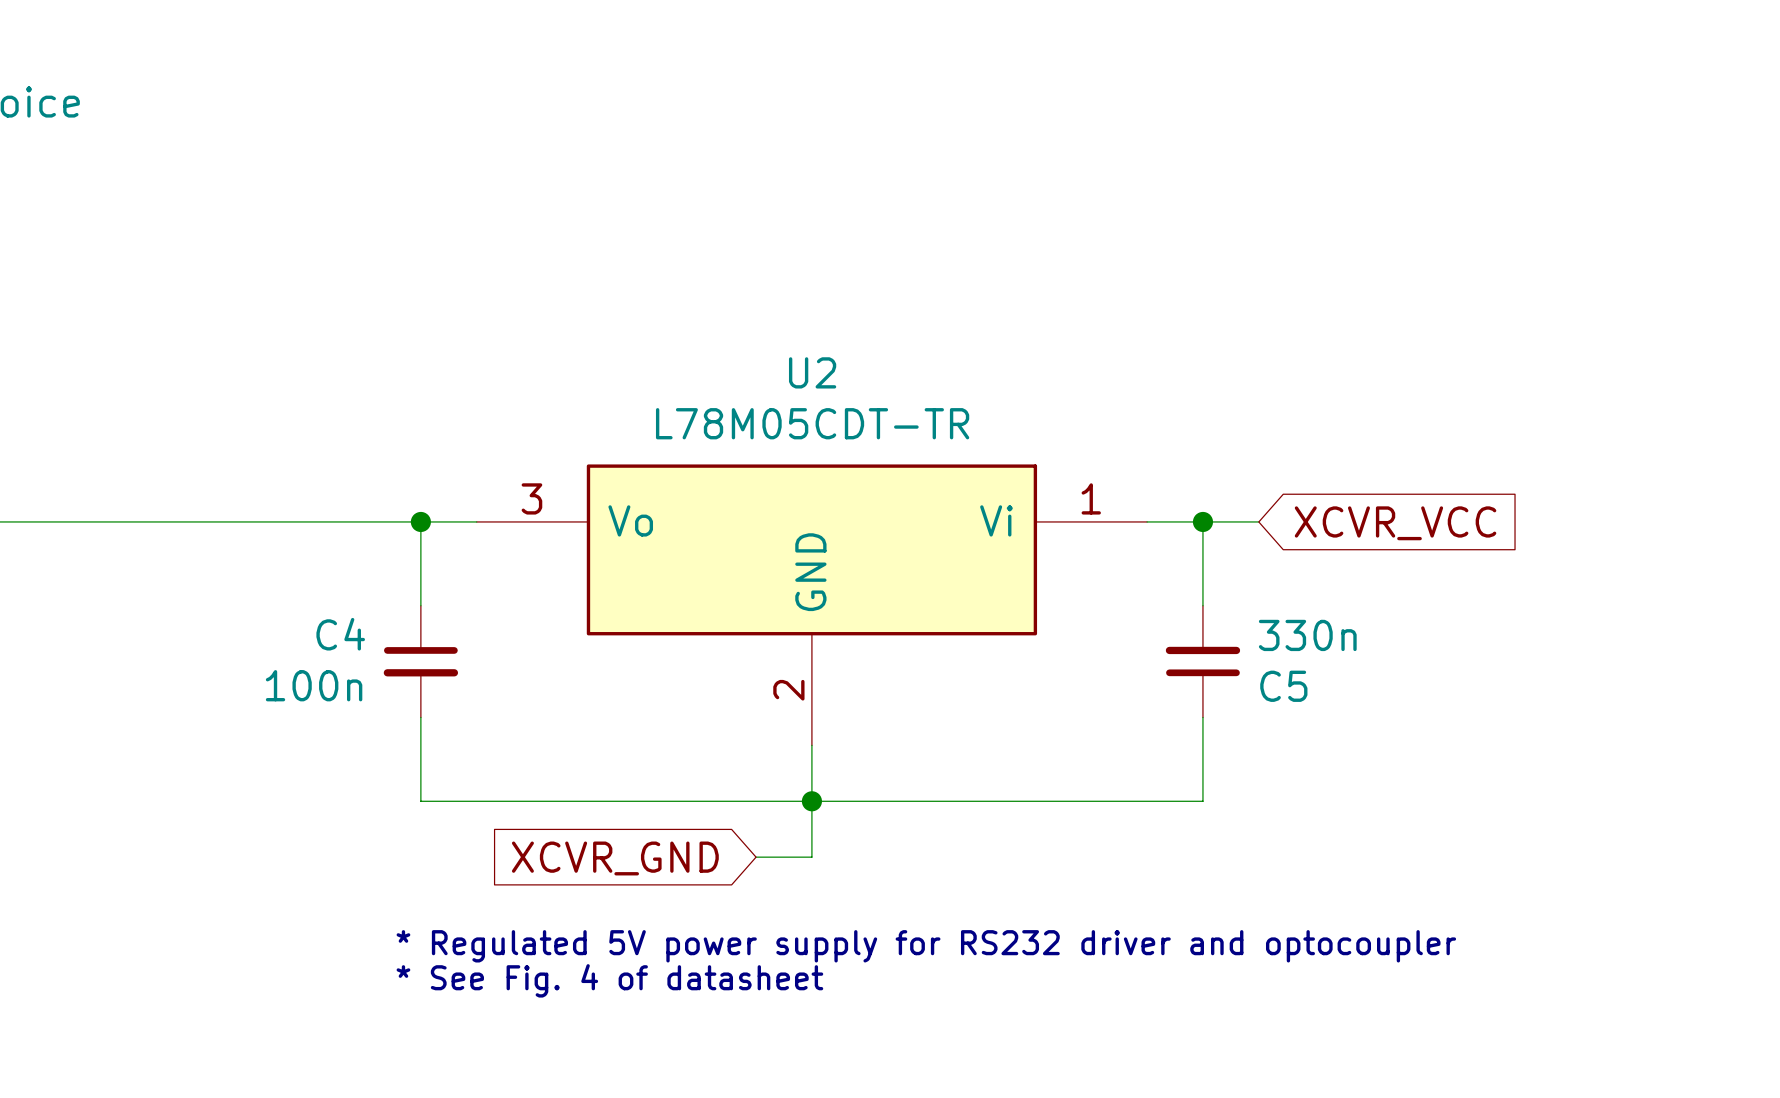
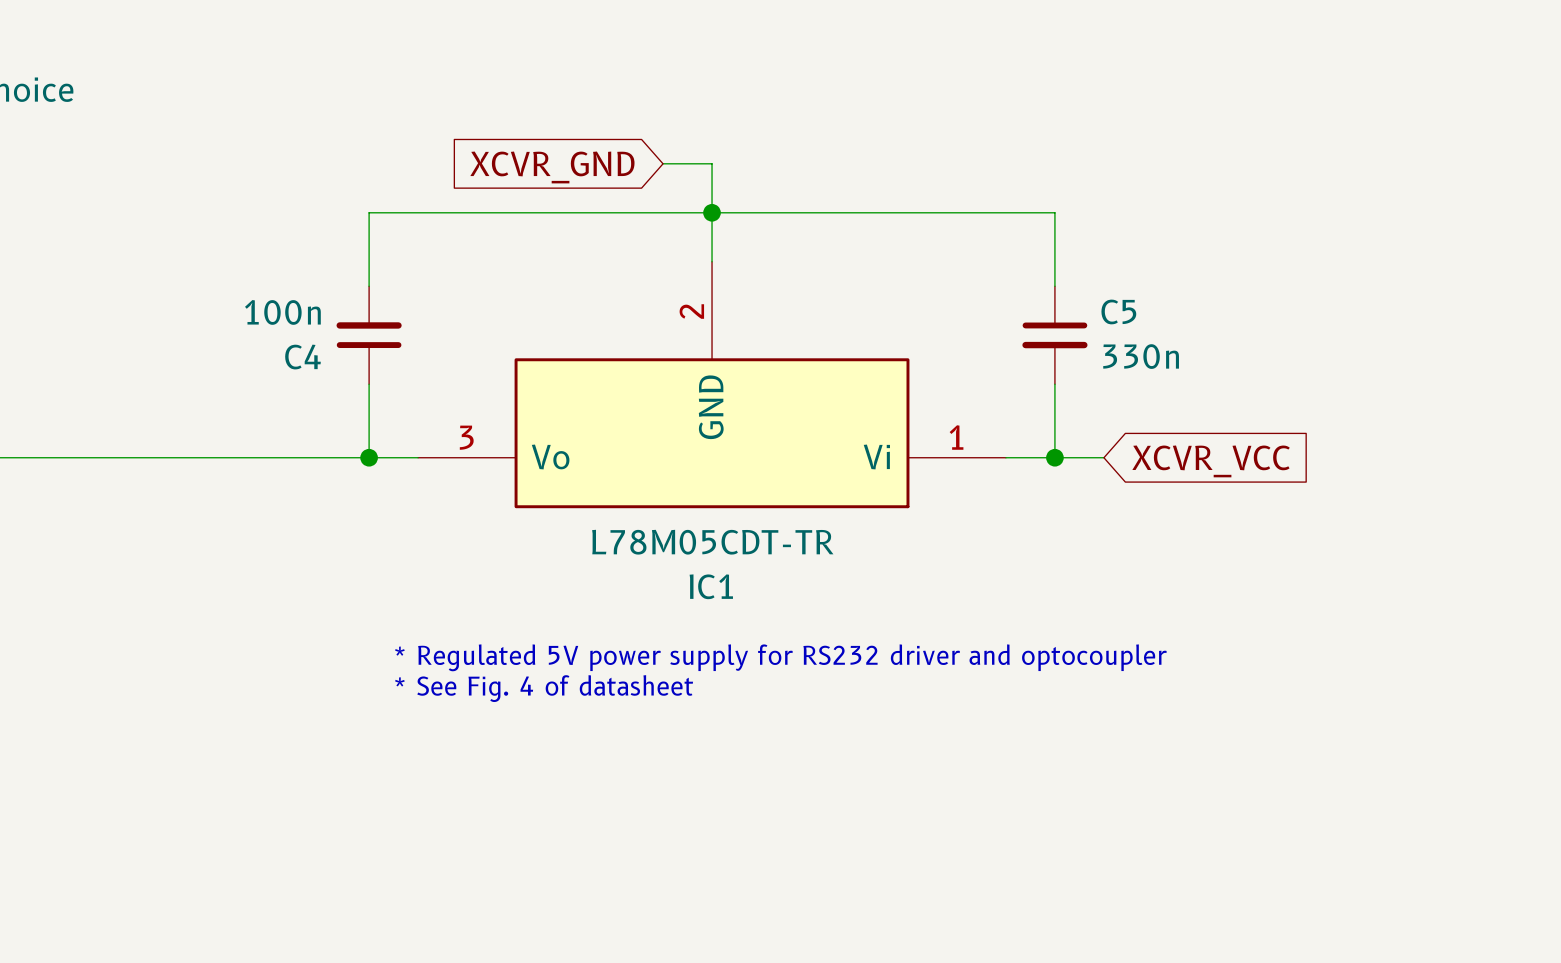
wire: none -> (663, 163) (712, 163) (712, 261)
global label: none -> XCVR_GND (552, 167)
junction: none -> (712, 212)
wire: none -> (369, 286) (369, 212) (1054, 212) (1054, 286)
IC1: none -> L78M05CDT-TR (712, 384)
wire: (420, 521) (420, 605) -> (369, 457) (369, 384)
wire: (1202, 521) (1202, 605) -> (1054, 457) (1054, 384)
U2: L78M05CDT-TR (811, 604) -> none
C4 name position: C4 (340, 634) -> C4 (302, 357)
C5 value position: 330n (1307, 635) -> 330n (1141, 356)
C4 rotation: 0° (420, 661) -> 180° (369, 335)
C4 position: (420, 661) -> (369, 335)
C5 rotation: 0° (1202, 661) -> 180° (1054, 335)
C5 position: (1202, 661) -> (1054, 335)
C4 value position: 100n (314, 685) -> 100n (282, 312)
C5 name position: C5 (1283, 686) -> C5 (1118, 311)
wire: (420, 717) (420, 801) (1202, 801) (1202, 717) -> none
wire: (811, 745) (811, 857) (756, 857) -> none
junction: (811, 801) -> none
global label: XCVR_GND (615, 858) -> none
text position: * Regulated 5V power supply for RS232 driver and optocoupler (926, 946) -> * Regulated 5V power supply for RS232 driver and optocoupler (780, 657)
text position: * See Fig. 4 of datasheet (609, 980) -> * See Fig. 4 of datasheet (544, 688)

